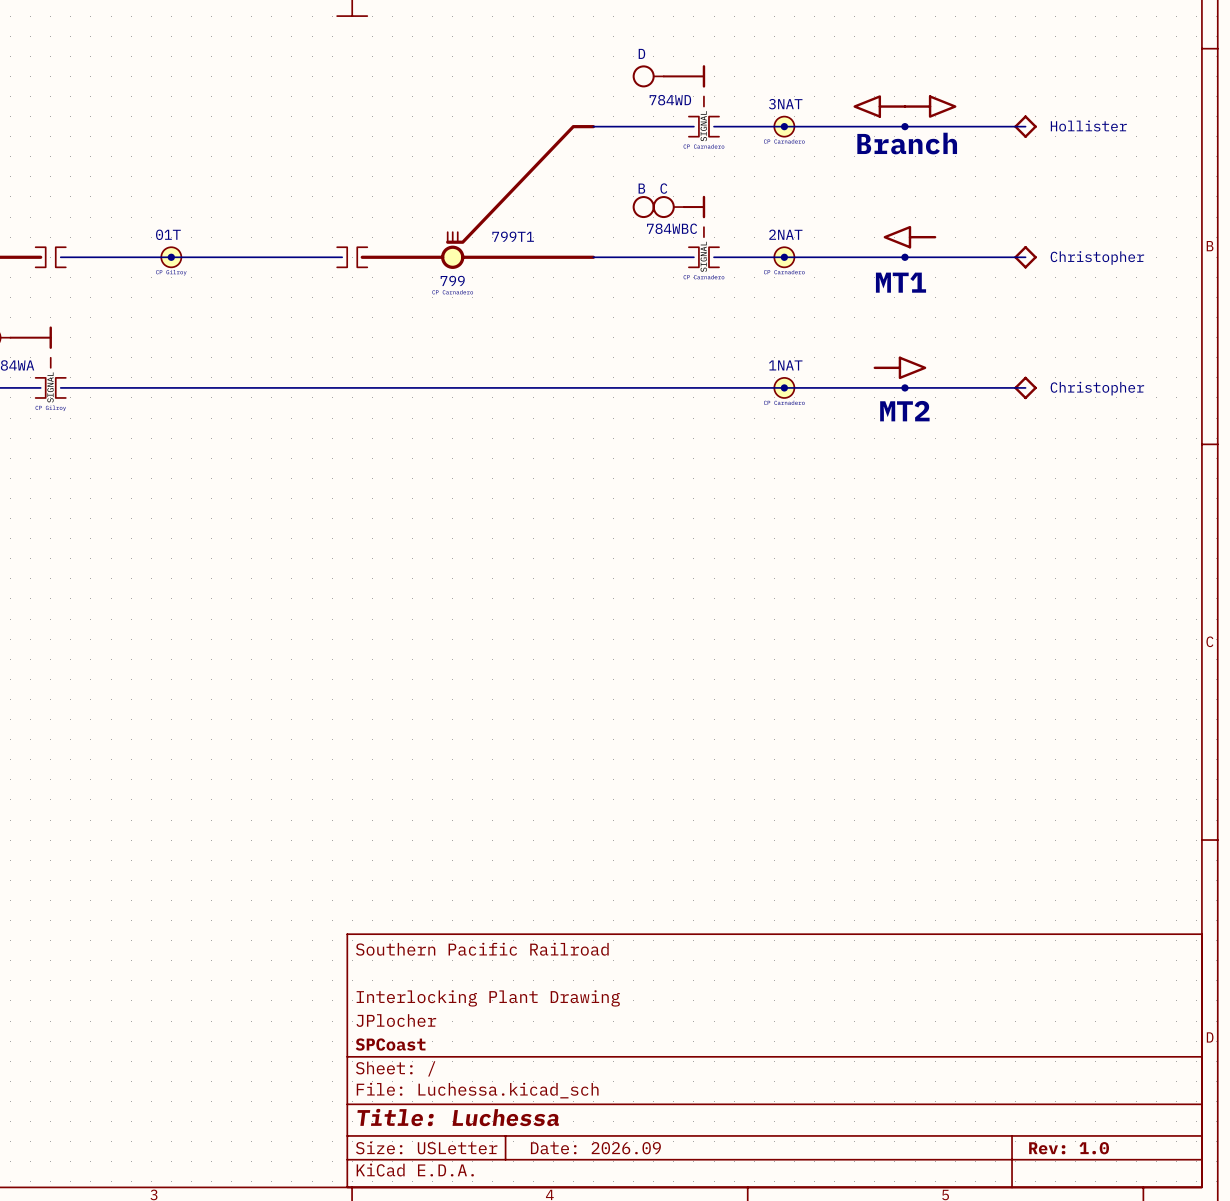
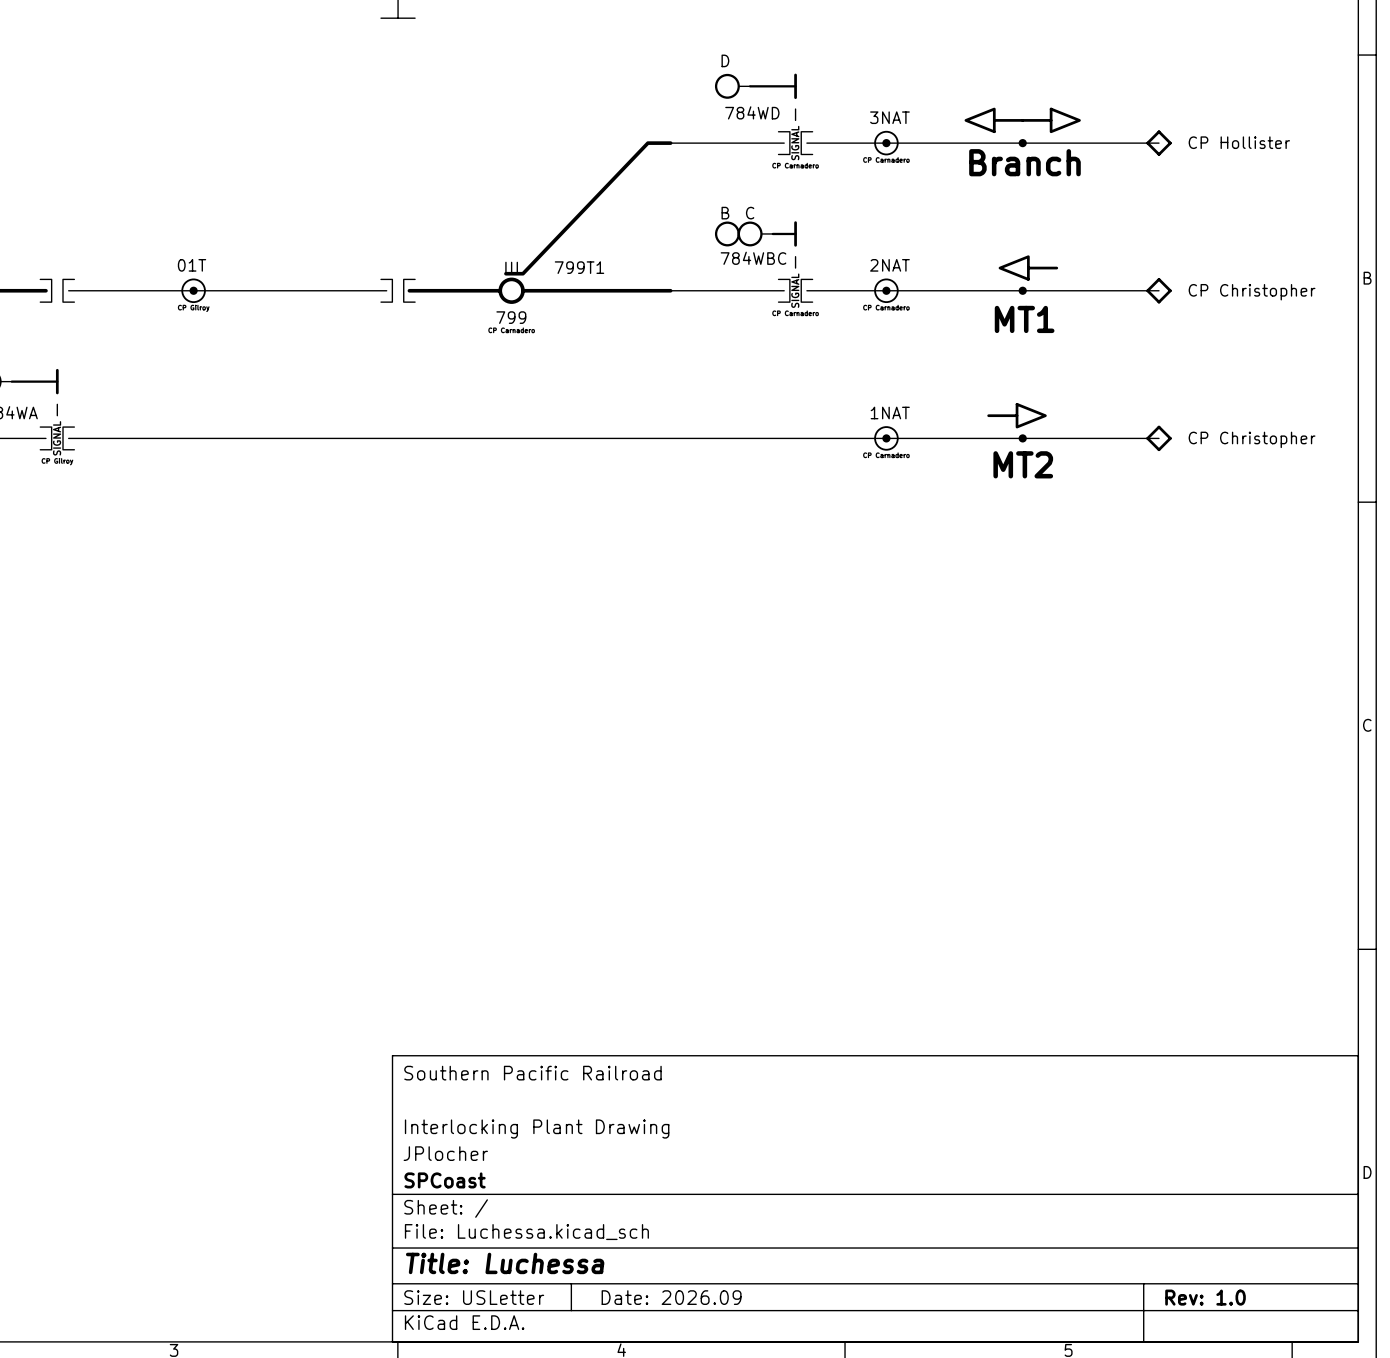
part value: Hollister (1088, 125) -> CP Hollister (1239, 142)
part value: Christopher (1097, 257) -> CP Christopher (1252, 292)
part value: Christopher (1097, 388) -> CP Christopher (1252, 439)

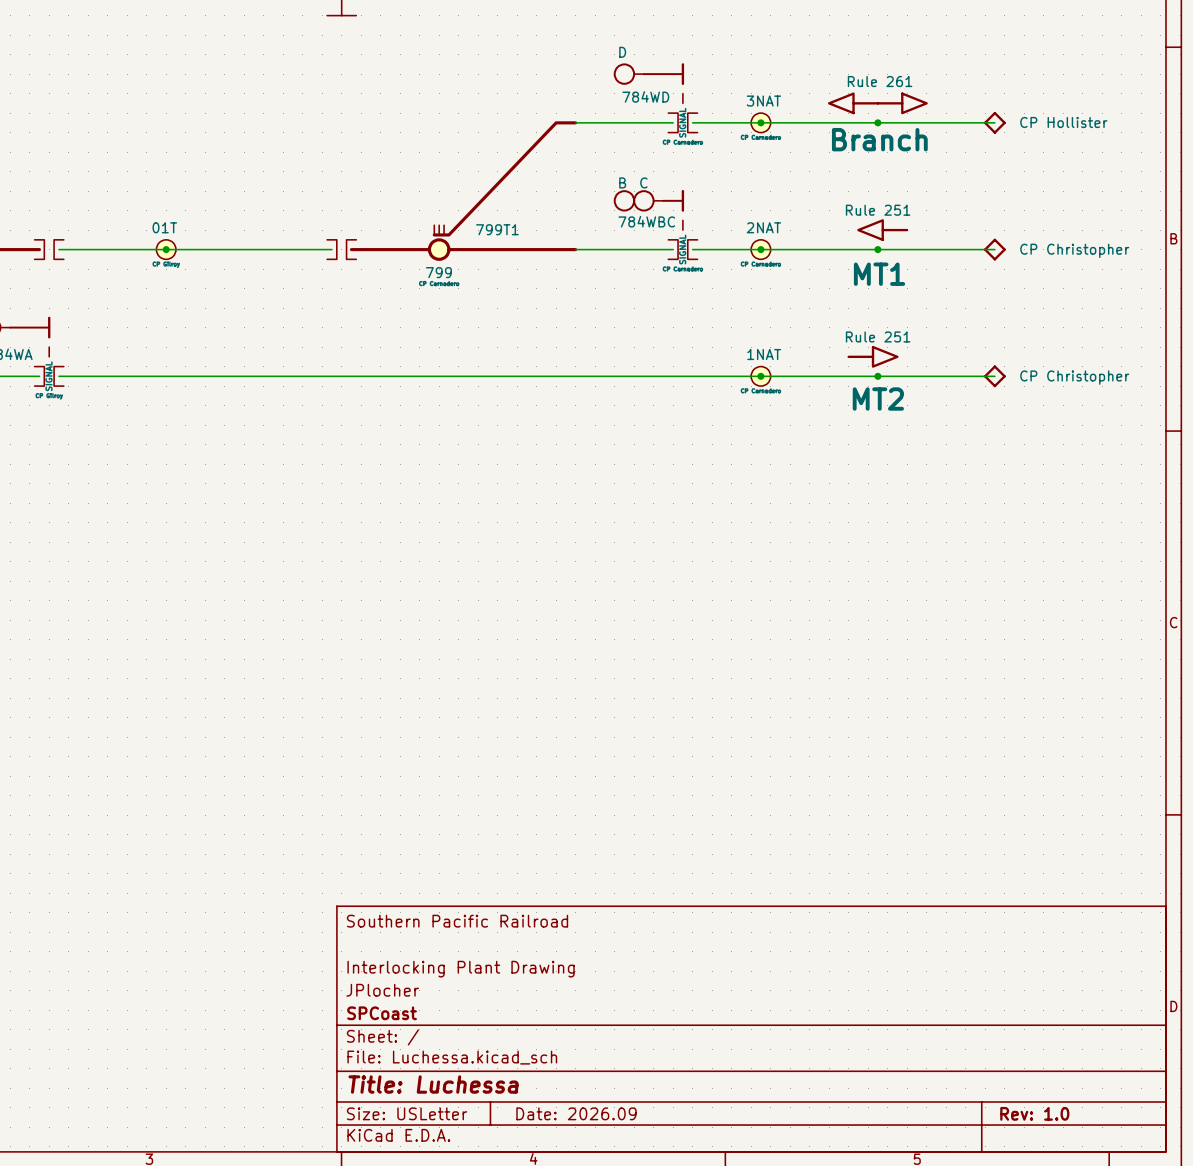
part text: none -> Rule 261 (880, 81)
part text: none -> Rule 251 (878, 210)
part text: none -> Rule 251 (878, 336)

